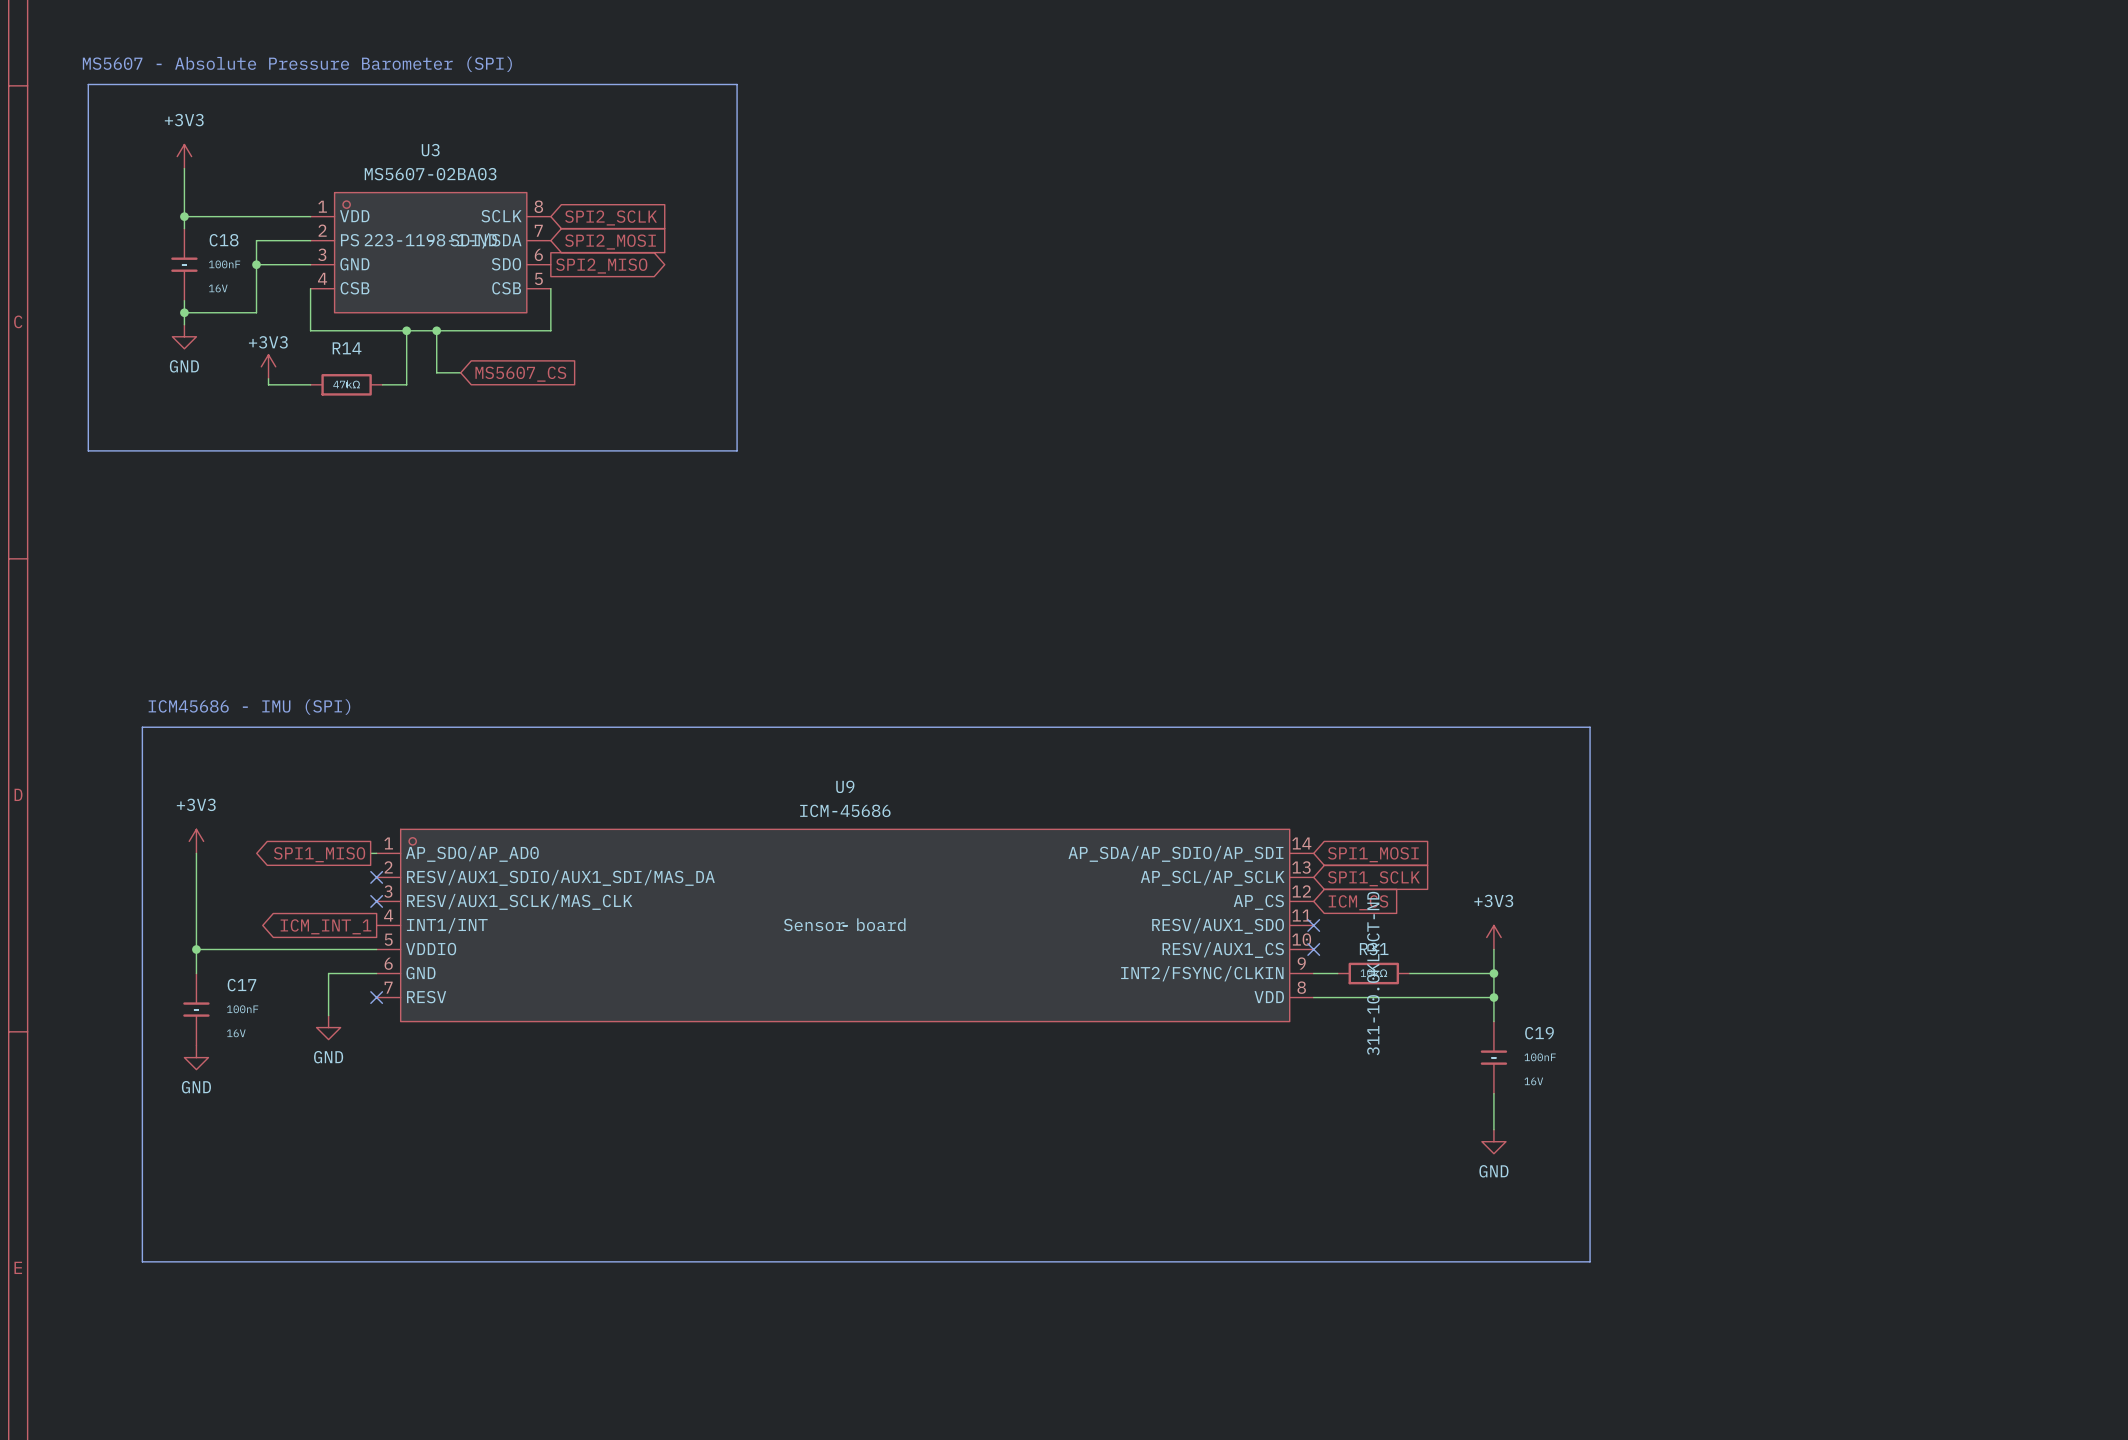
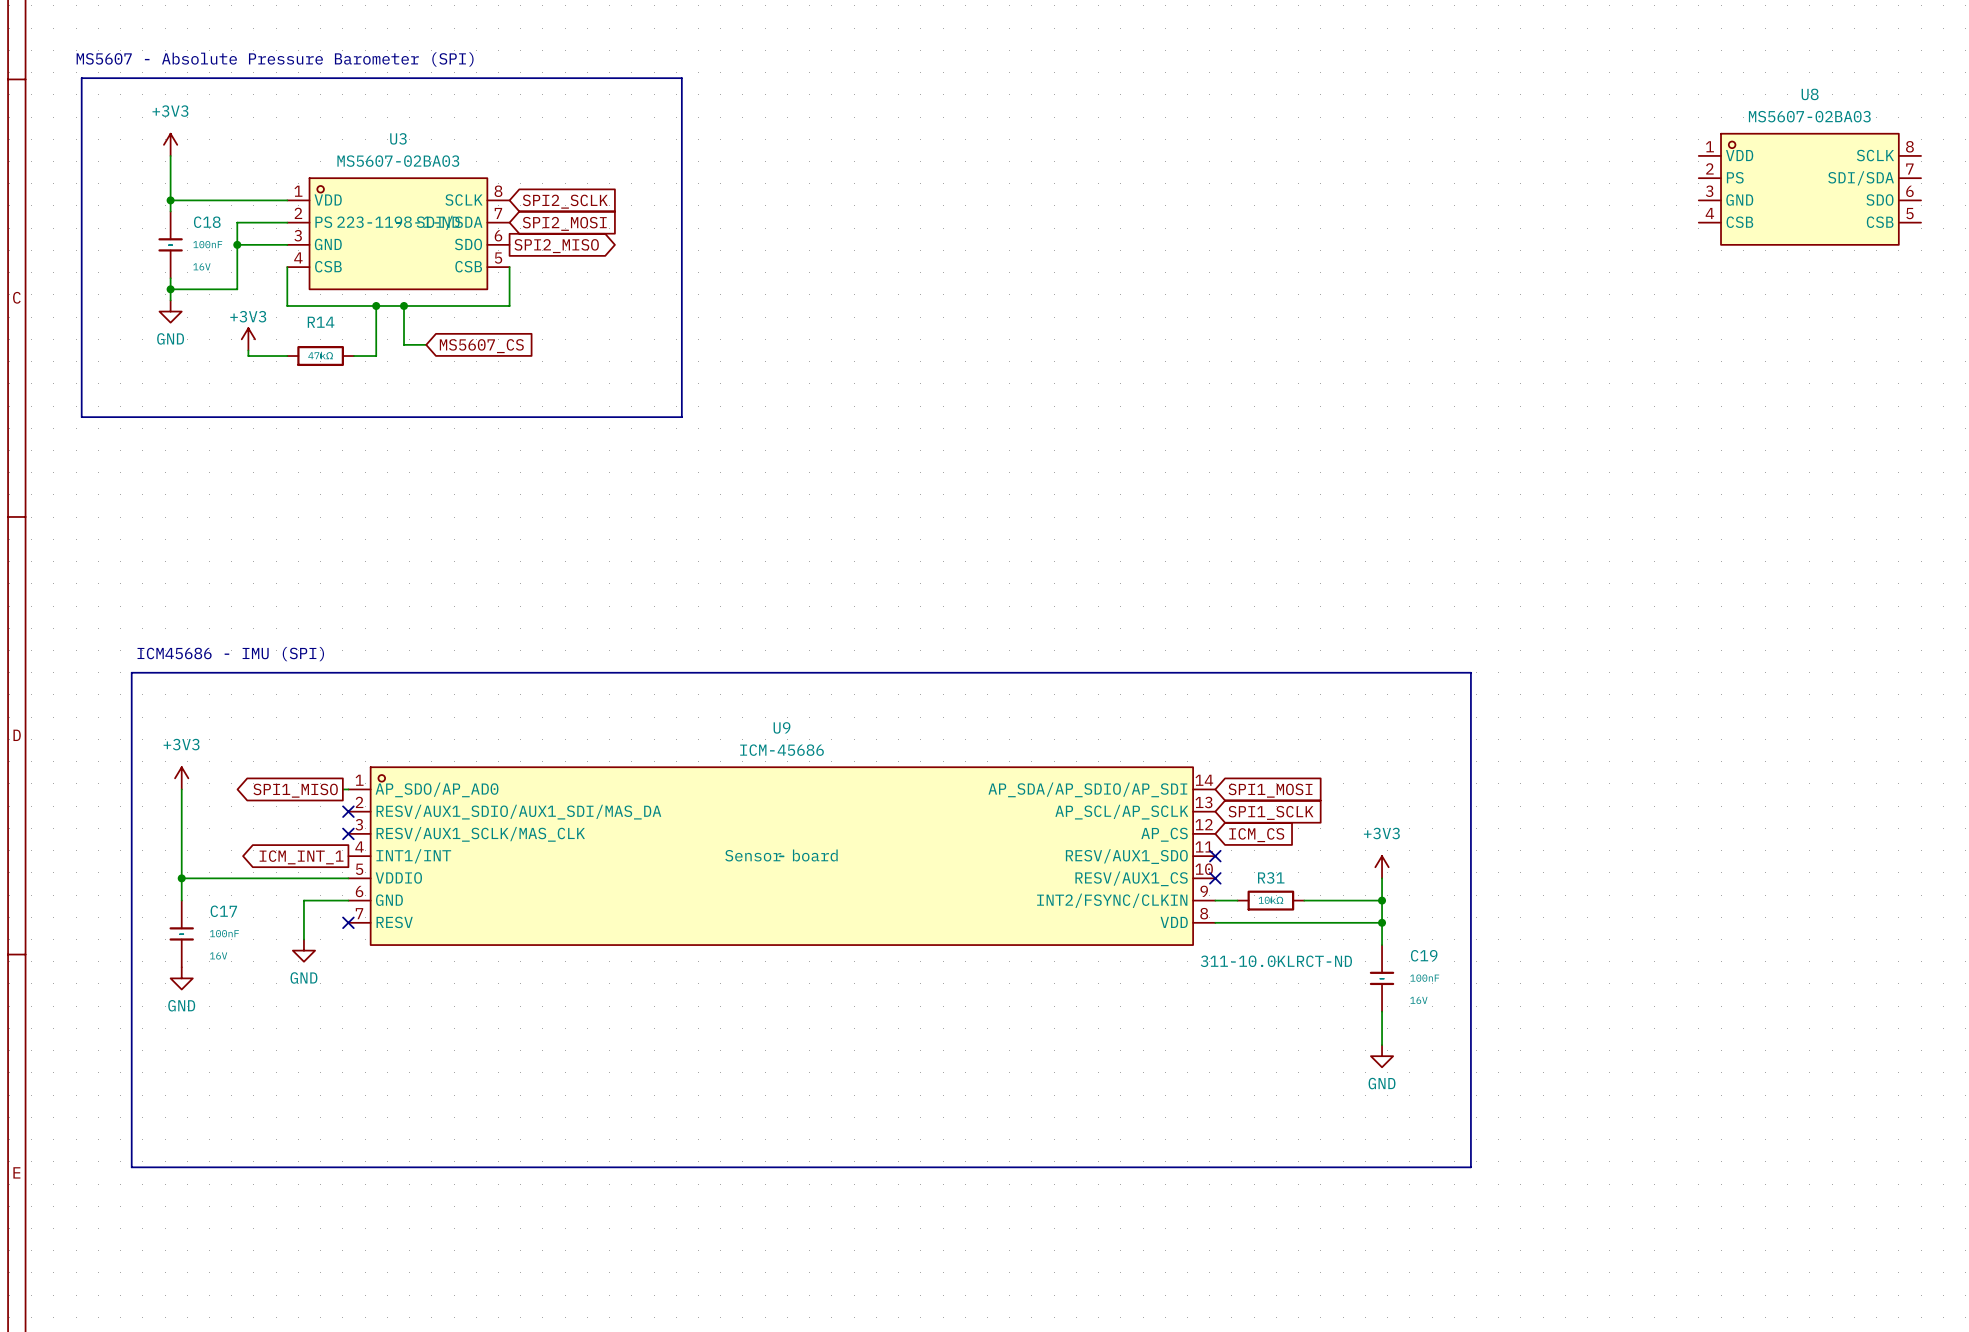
U8: none -> MS5607-02BA03 (1809, 189)
R31 text rotation: 0° (1373, 973) -> 90° clockwise (1276, 961)

